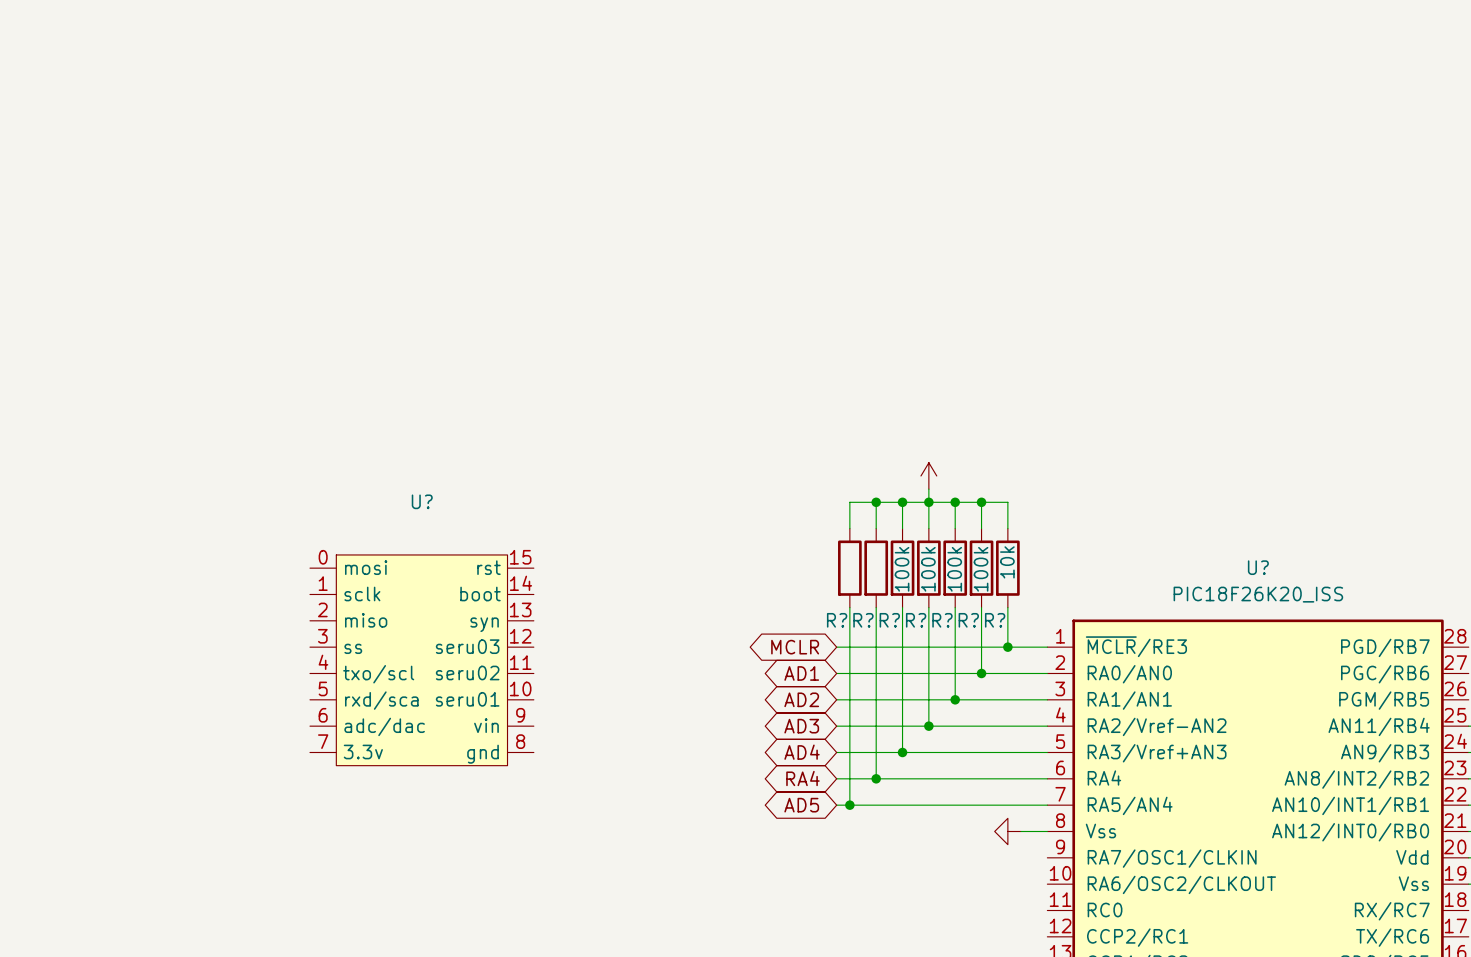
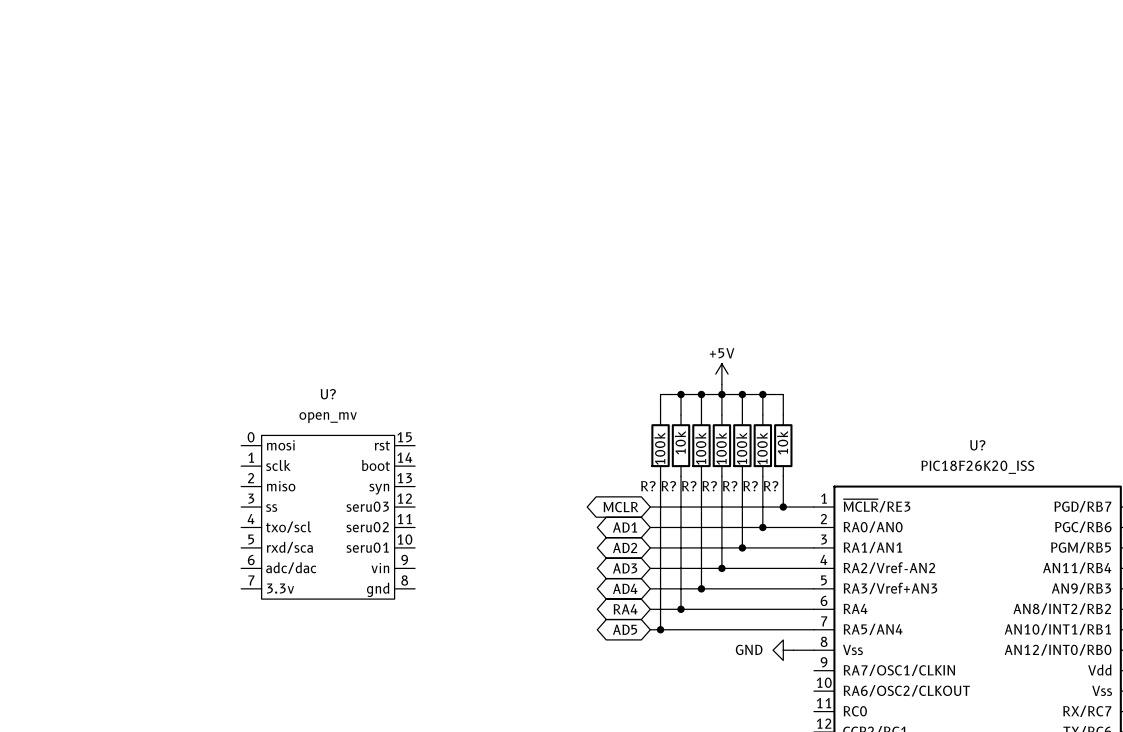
power symbol text: none -> +5V (722, 353)
U? value: none -> open_mv (328, 417)
R? value: none -> 10k (680, 442)
R? value: none -> 100k (659, 448)
power symbol text: none -> GND (749, 649)

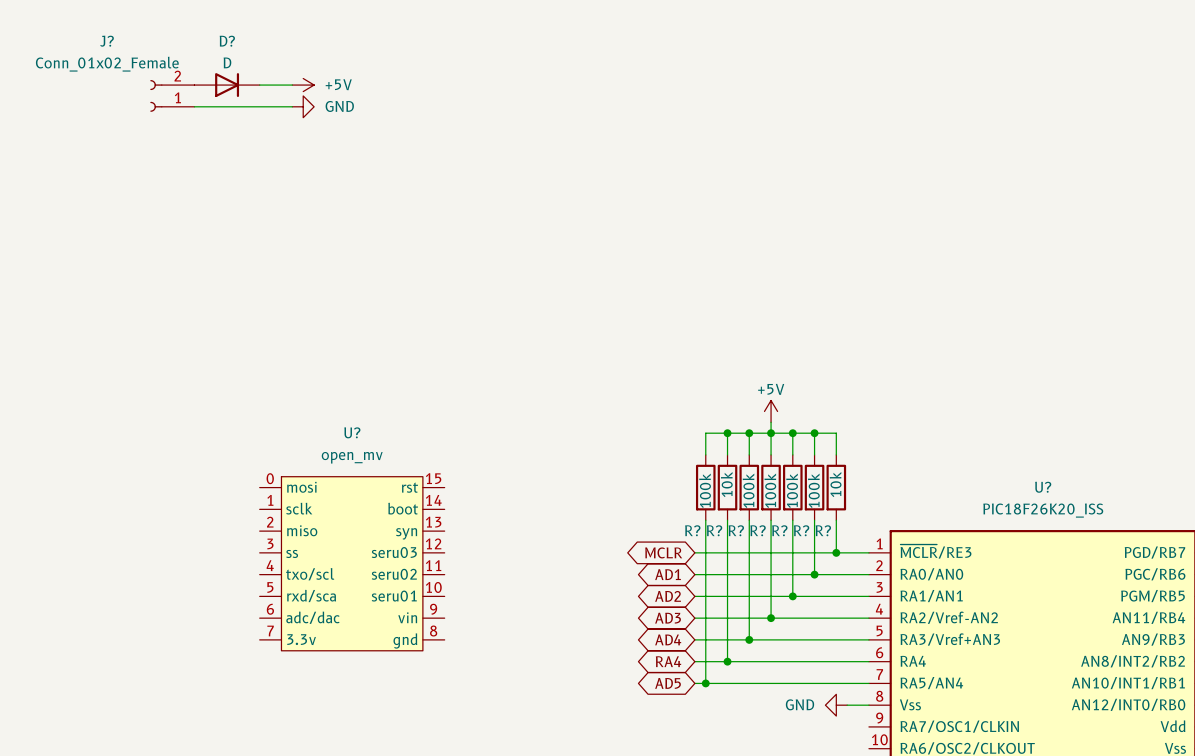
D?: none -> D (227, 85)
wire: none -> (259, 85) (292, 85)
power symbol: none -> +5V (303, 85)
J?: none -> Conn_01x02_Female (172, 95)
wire: none -> (194, 106) (292, 106)
power symbol: none -> GND (303, 106)

